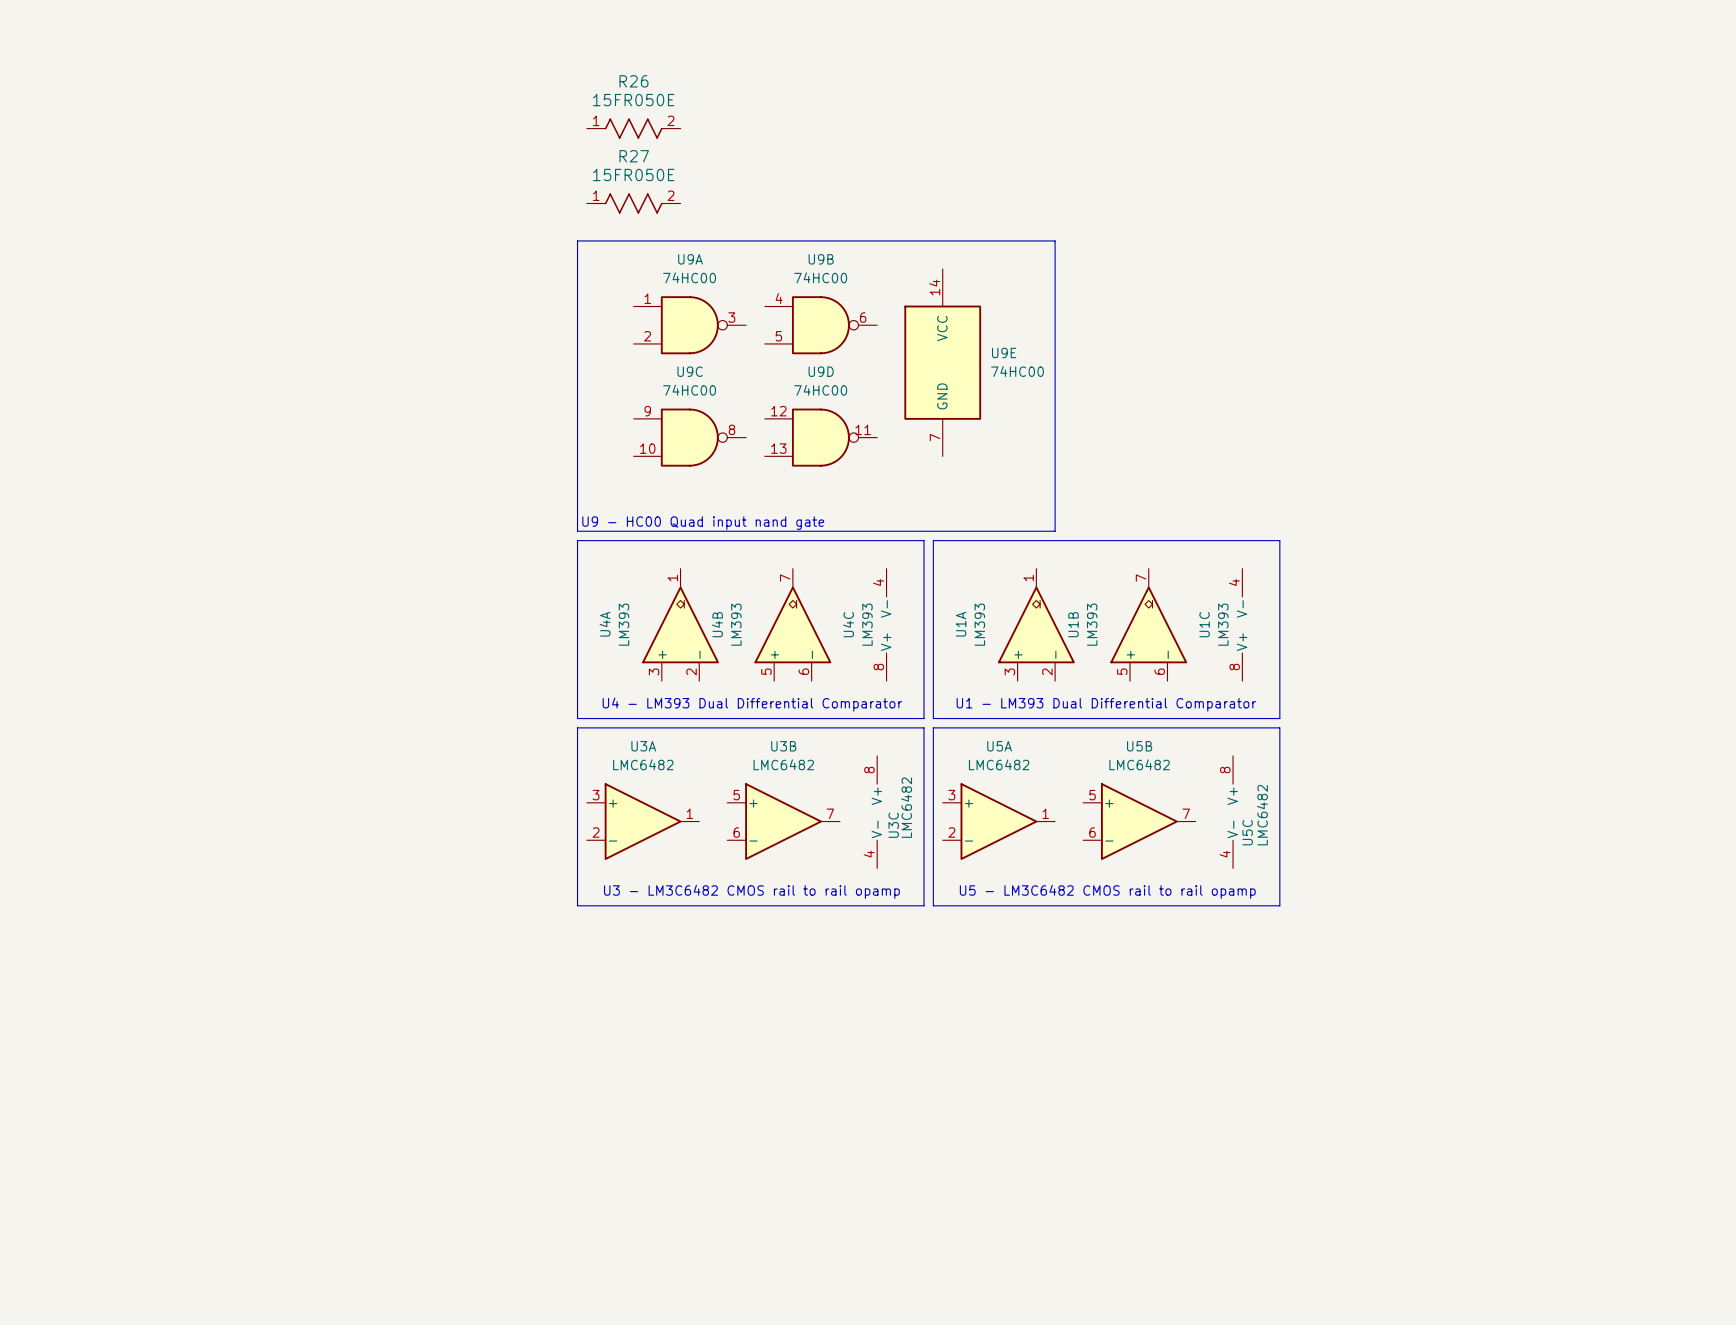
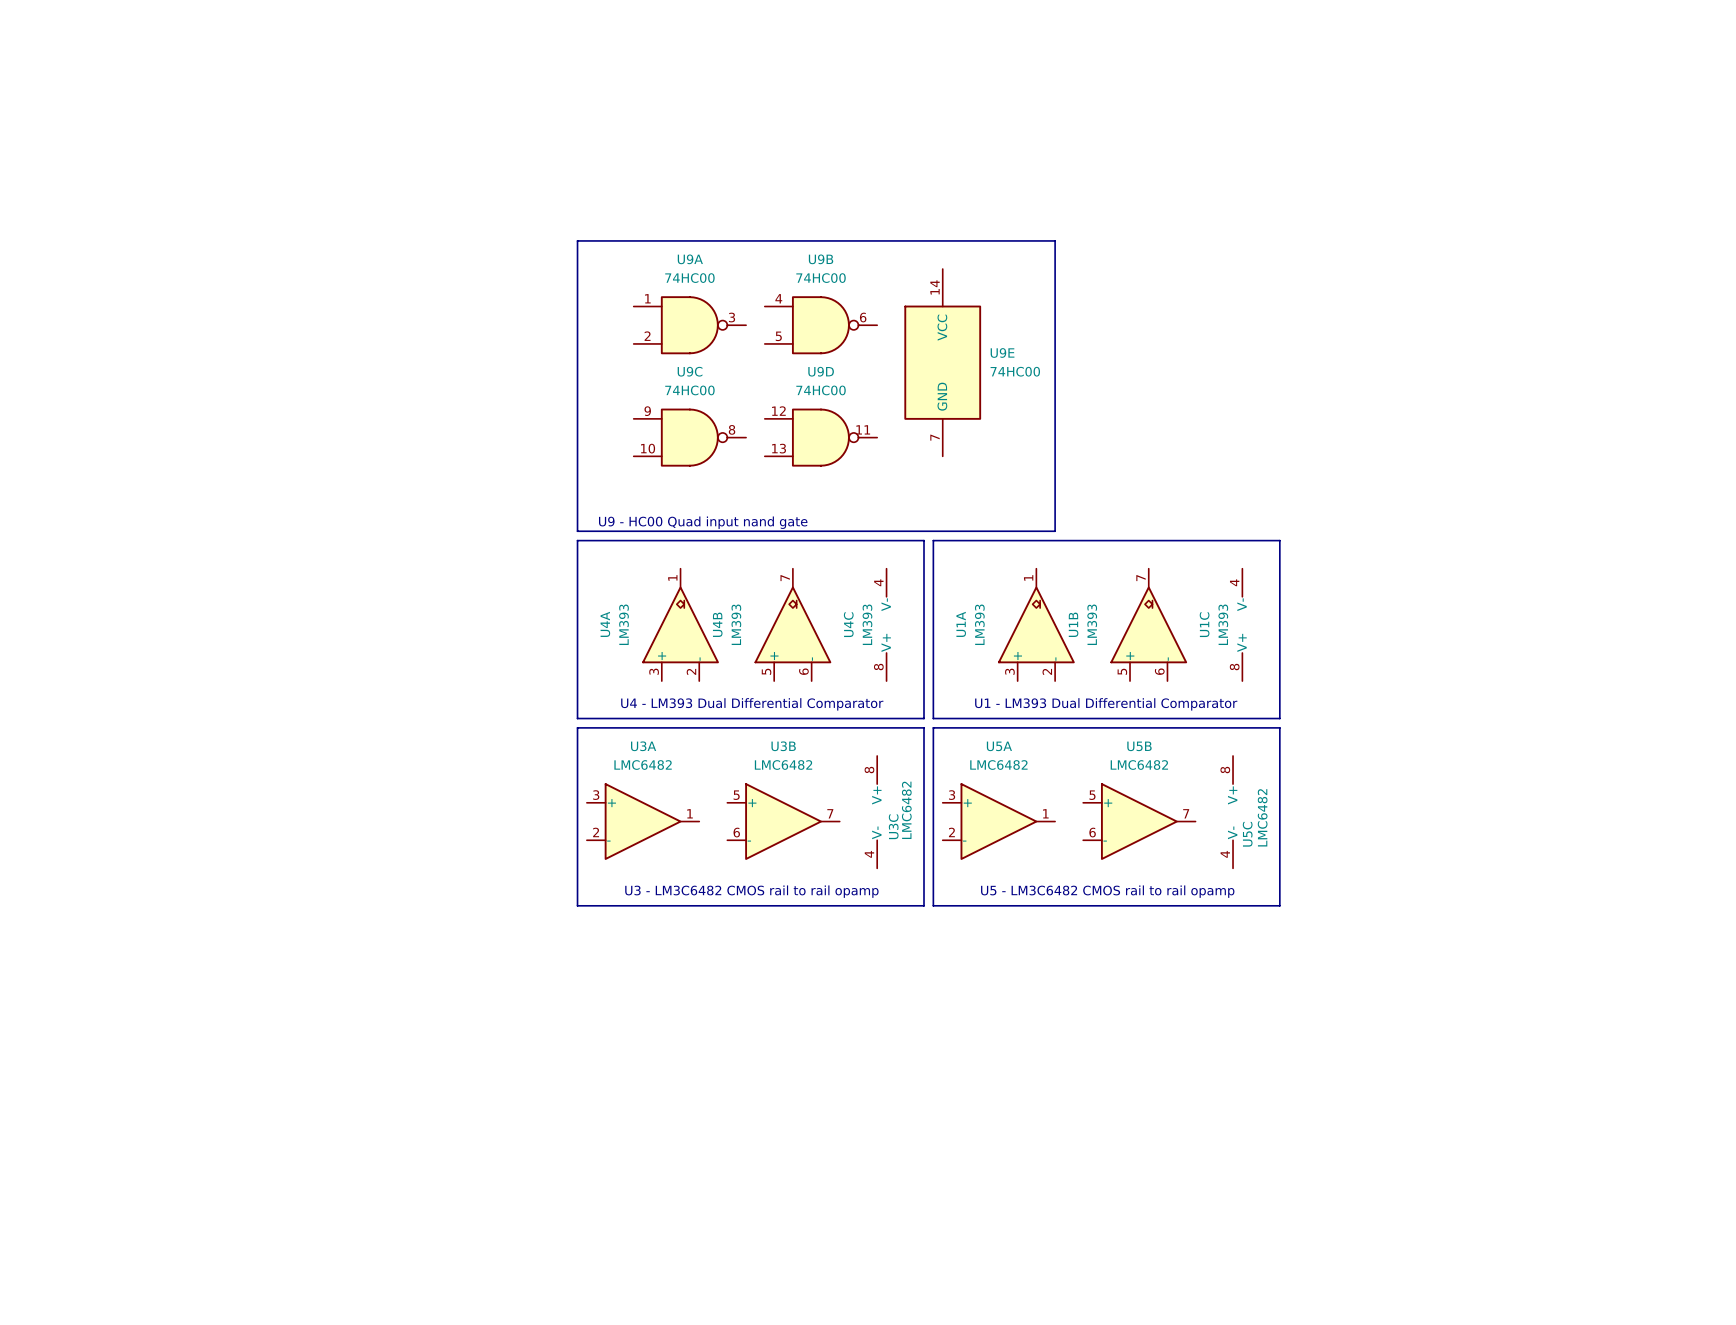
R26: 15FR050E (633, 128) -> none
R27: 15FR050E (633, 203) -> none

